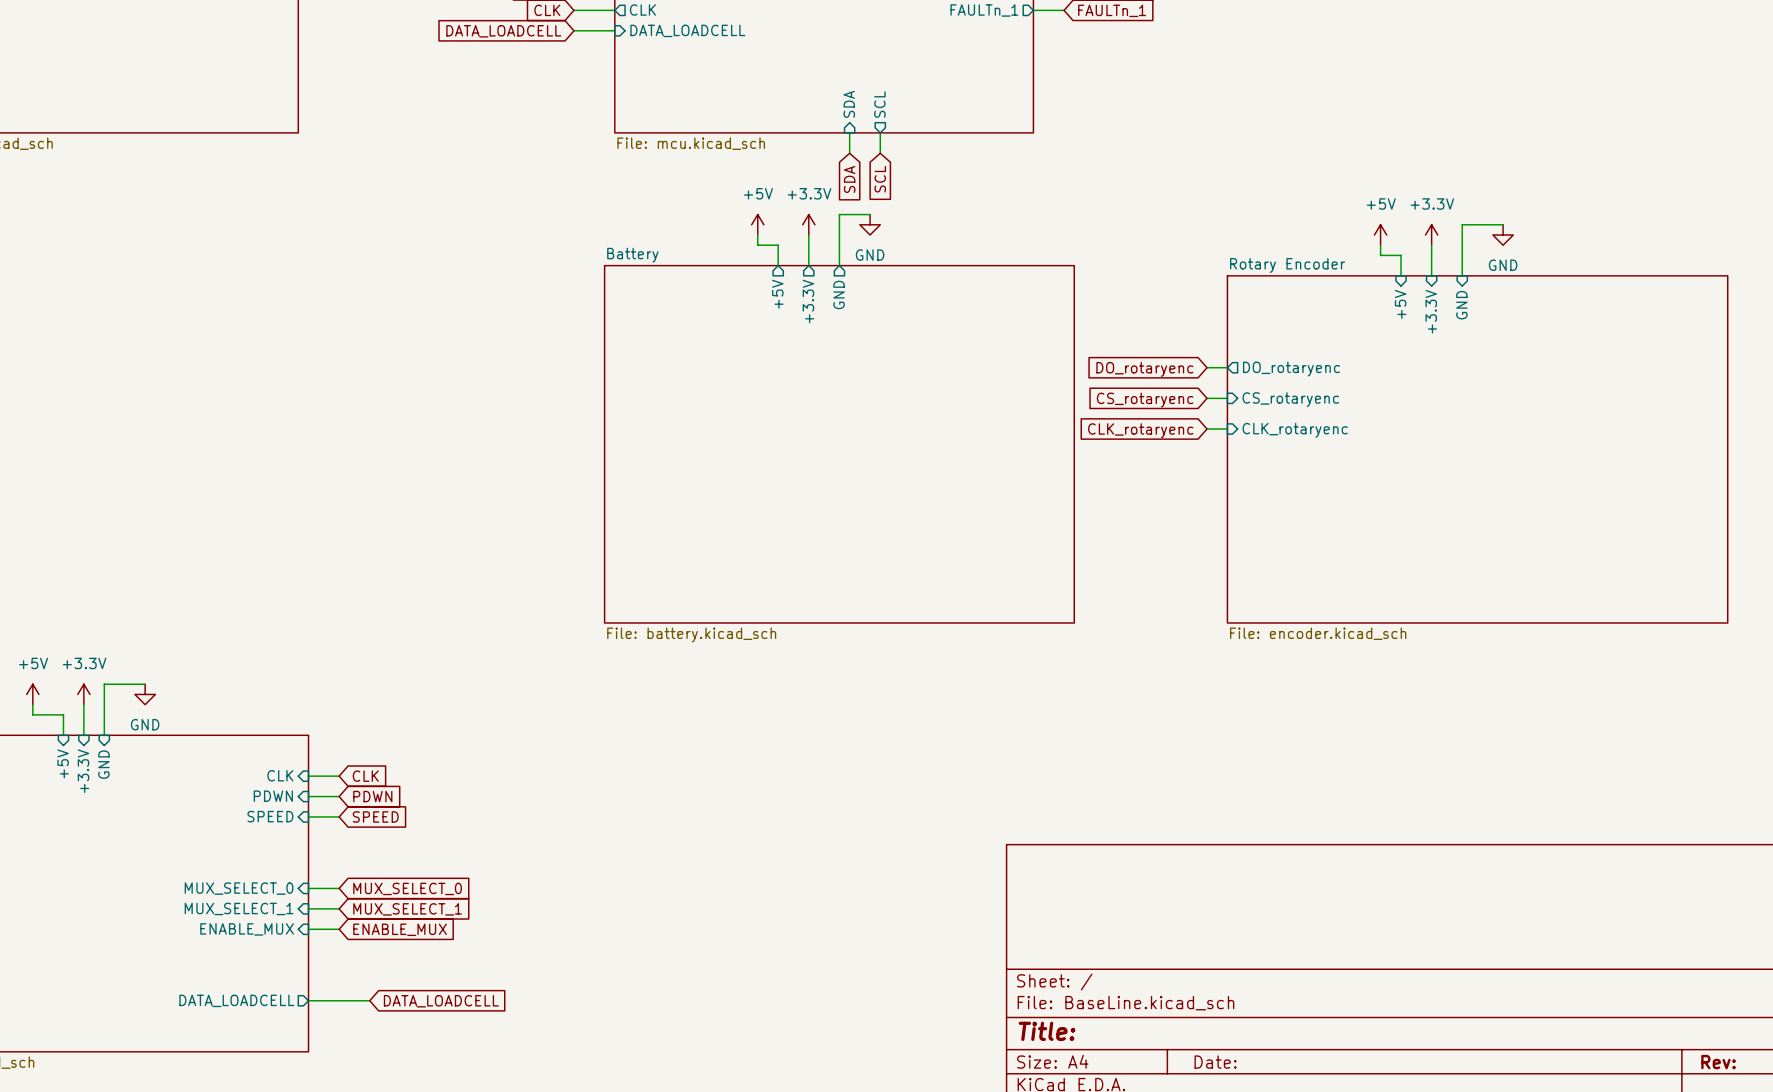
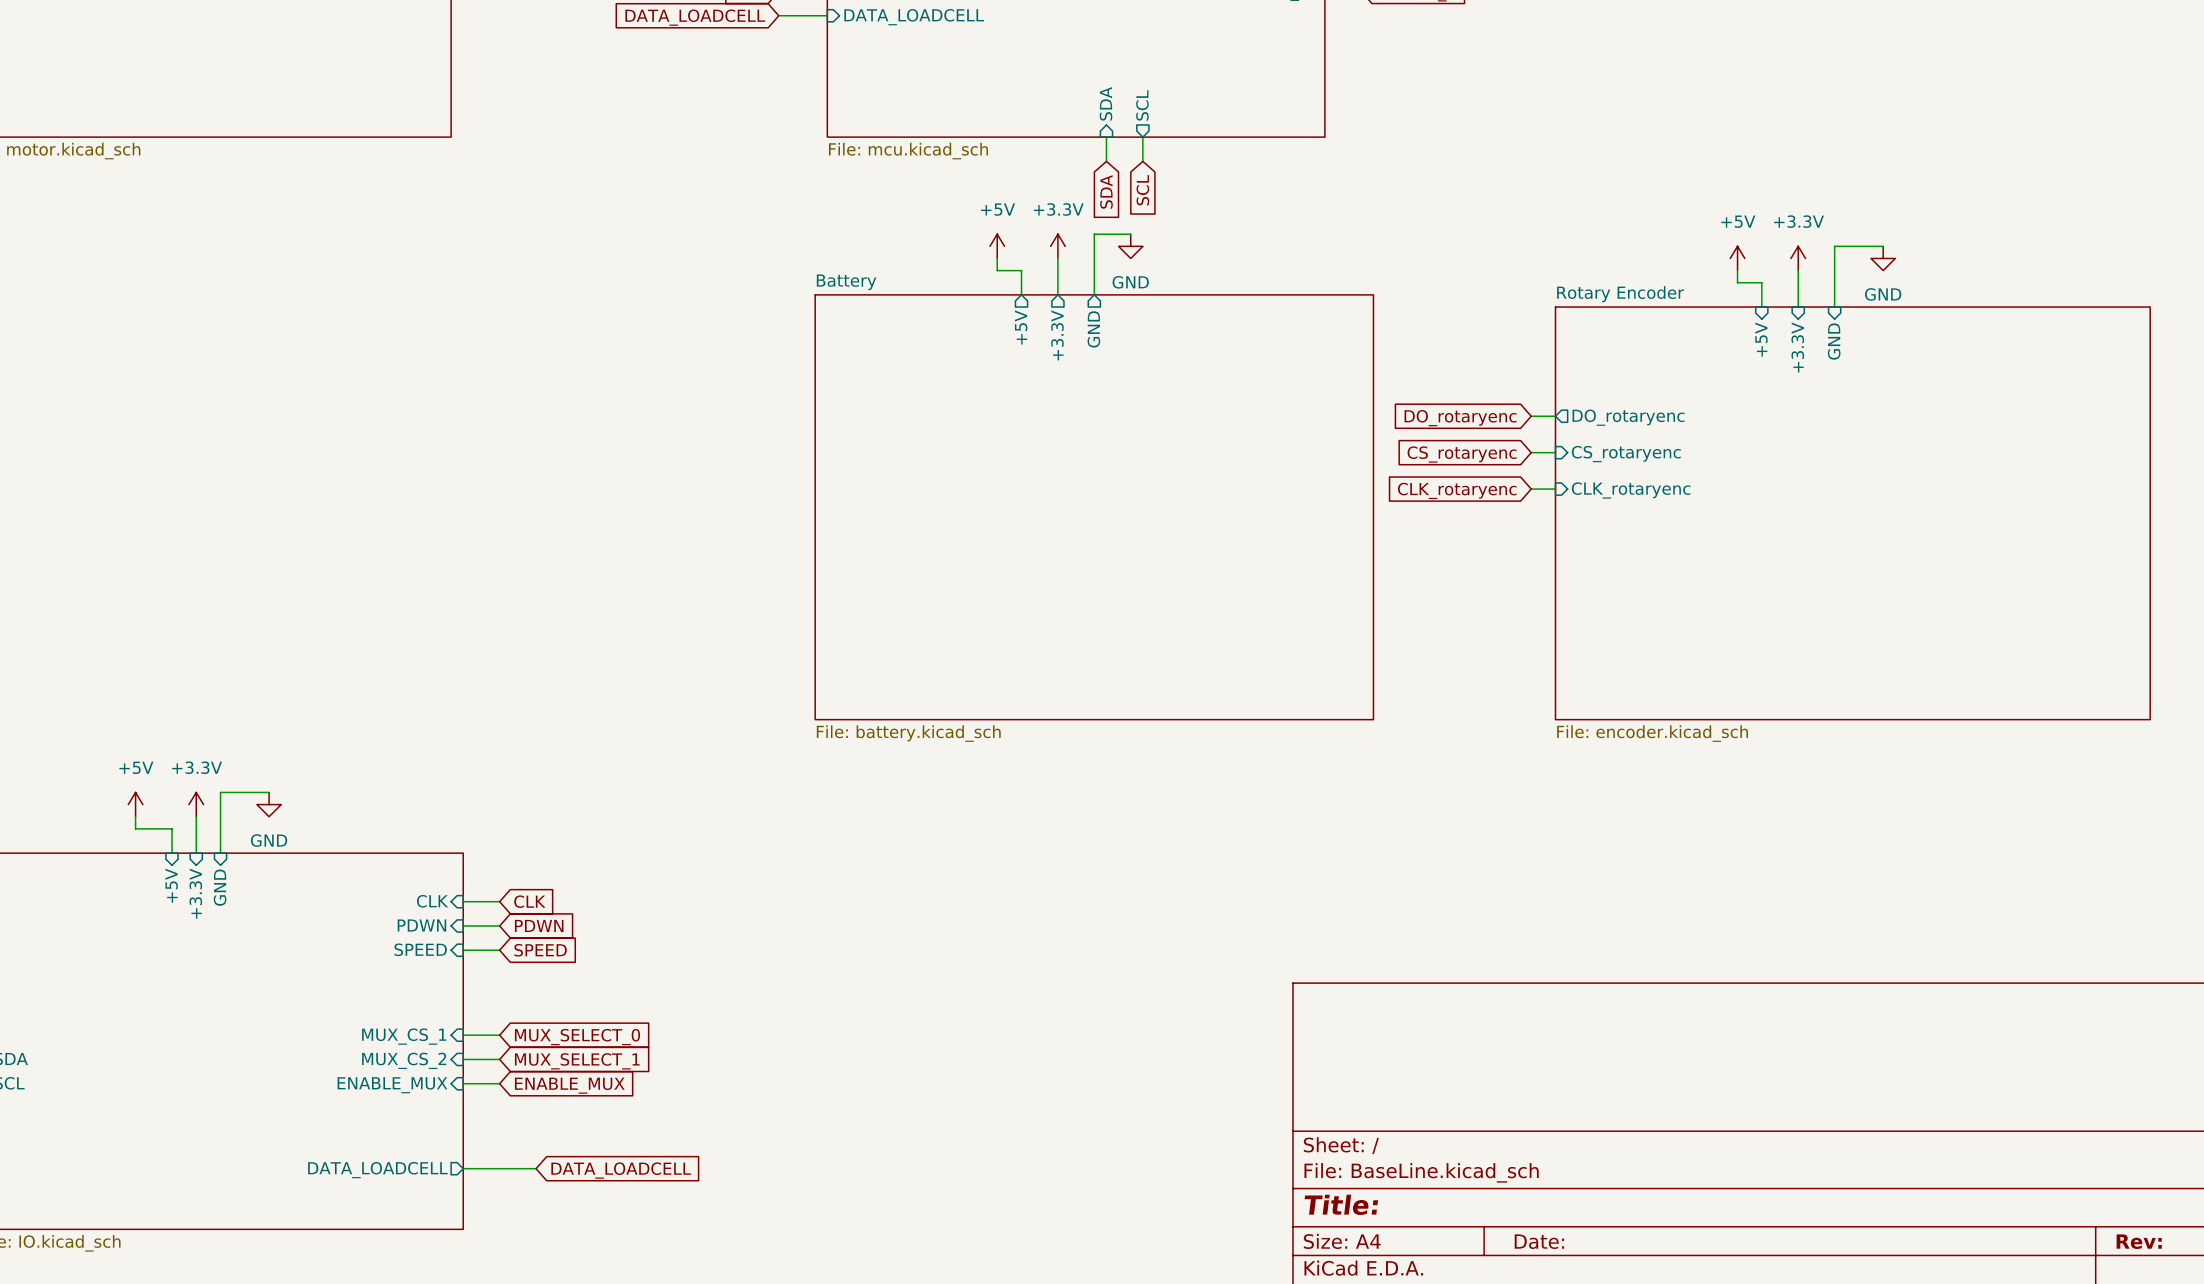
sheet pin: MUX_SELECT_0 (239, 888) -> MUX_CS_1 (404, 1036)
sheet pin: MUX_SELECT_1 (239, 908) -> MUX_CS_2 (404, 1060)

